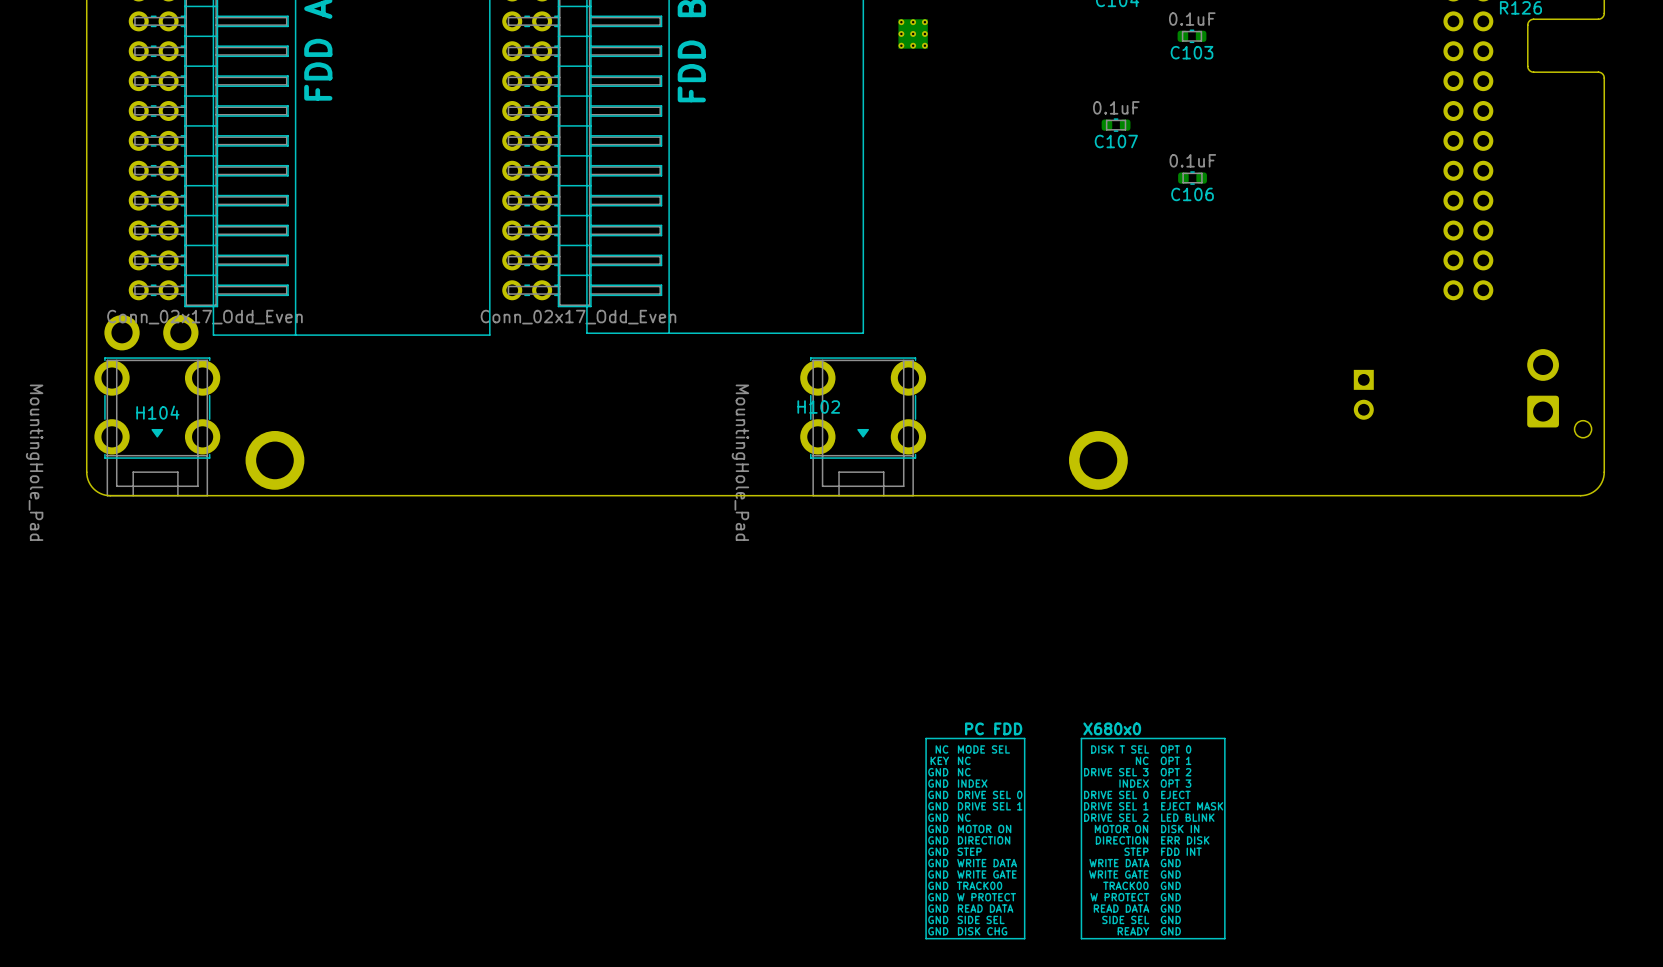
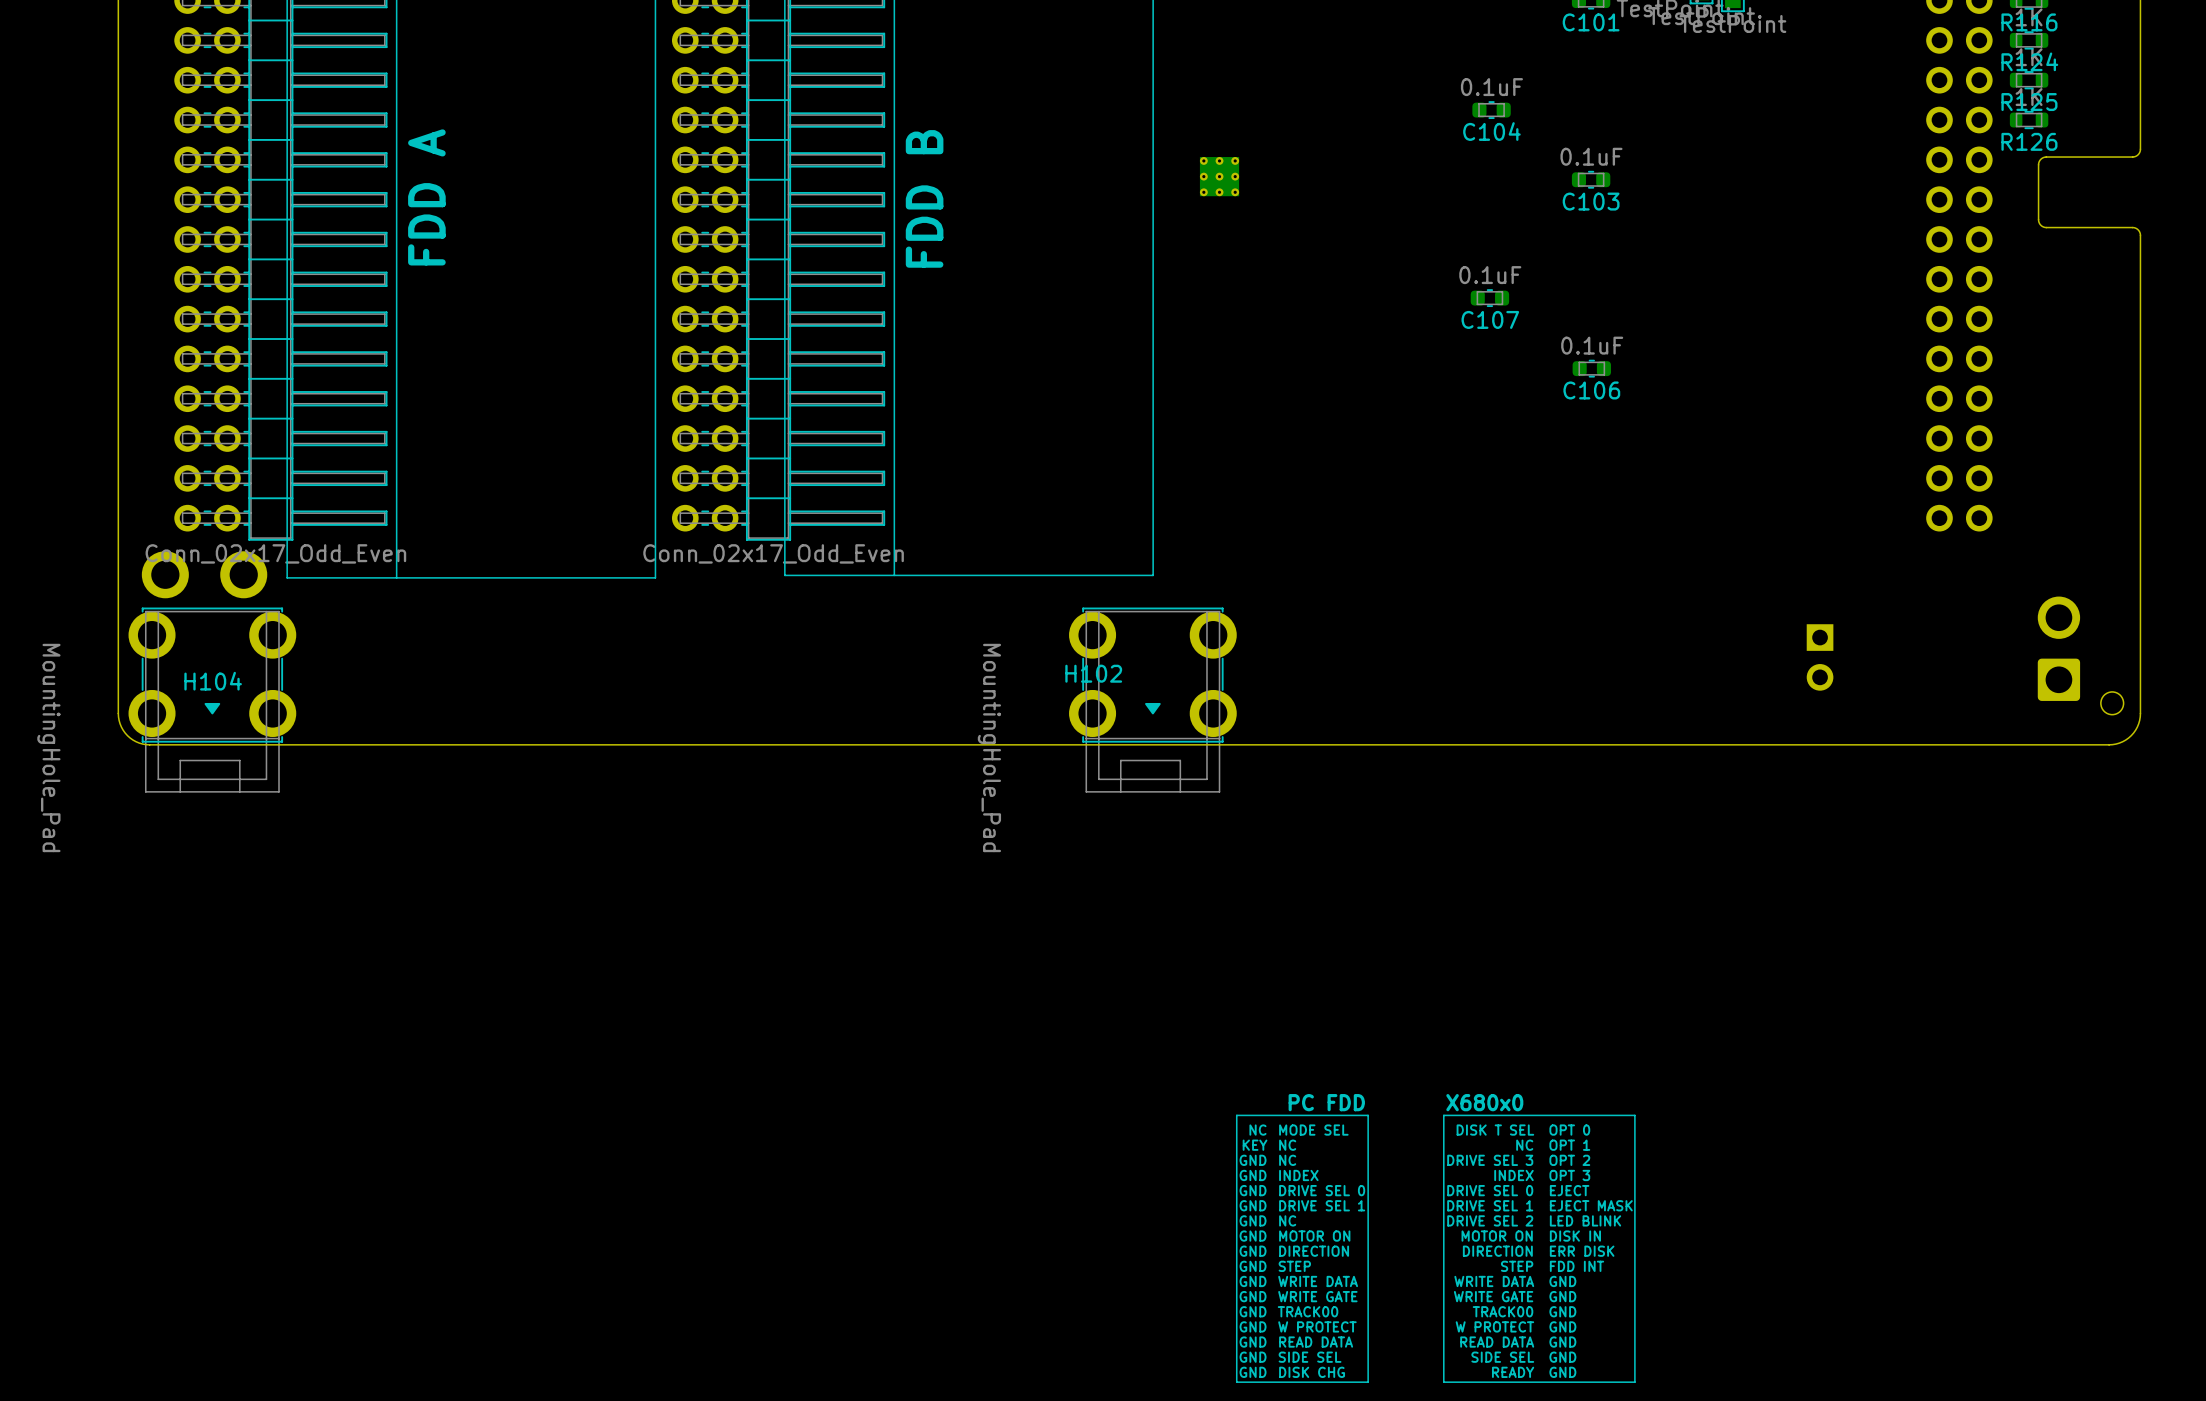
board edge: (1604, 436) (1602, 479) (1595, 490) (1580, 495) (110, 495) (95, 490) (88, 479) (86, 436) -> (2140, 713) (2137, 727) (2131, 735) (2122, 741) (2109, 744) (149, 744) (136, 741) (127, 735) (121, 727) (118, 713)
part: (274, 460) -> none
part: (1098, 460) -> none

